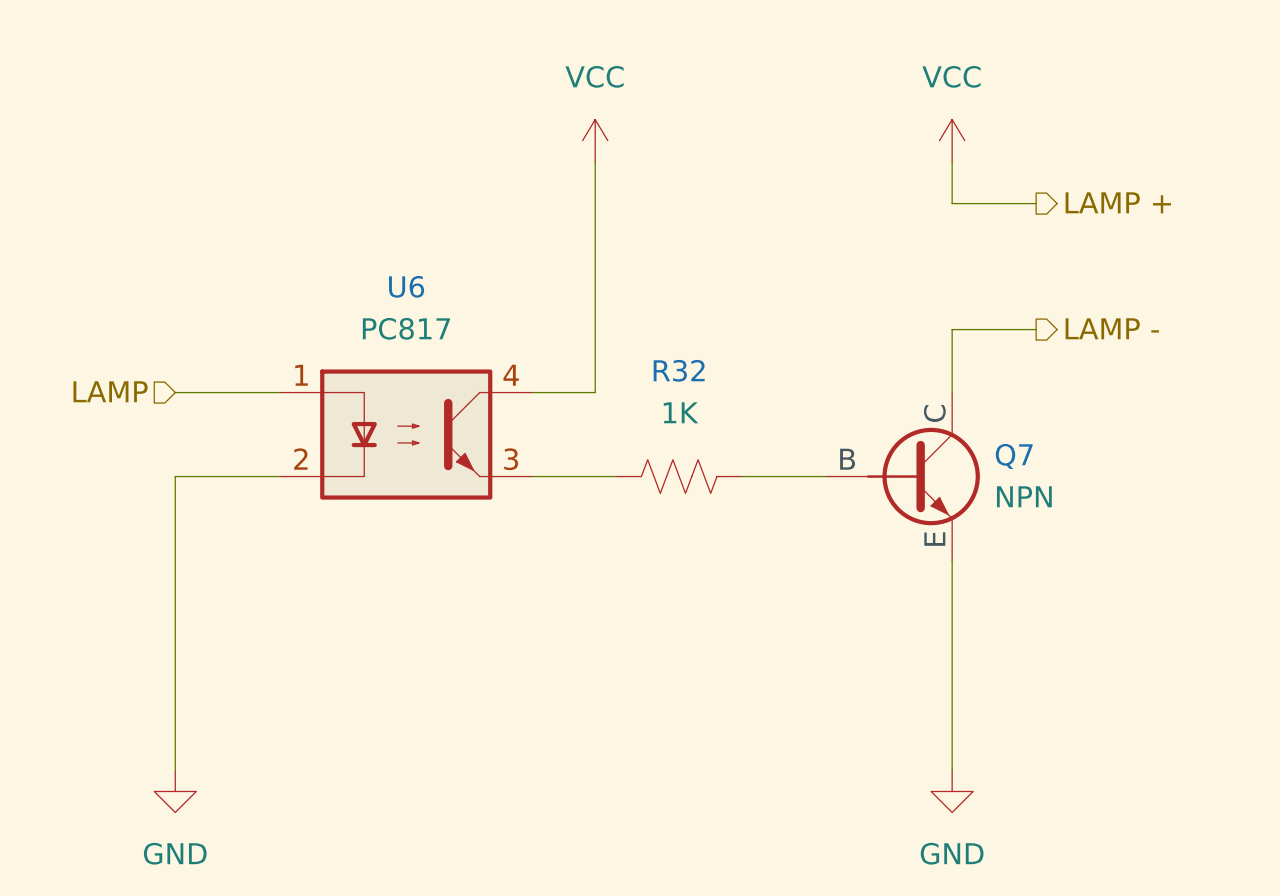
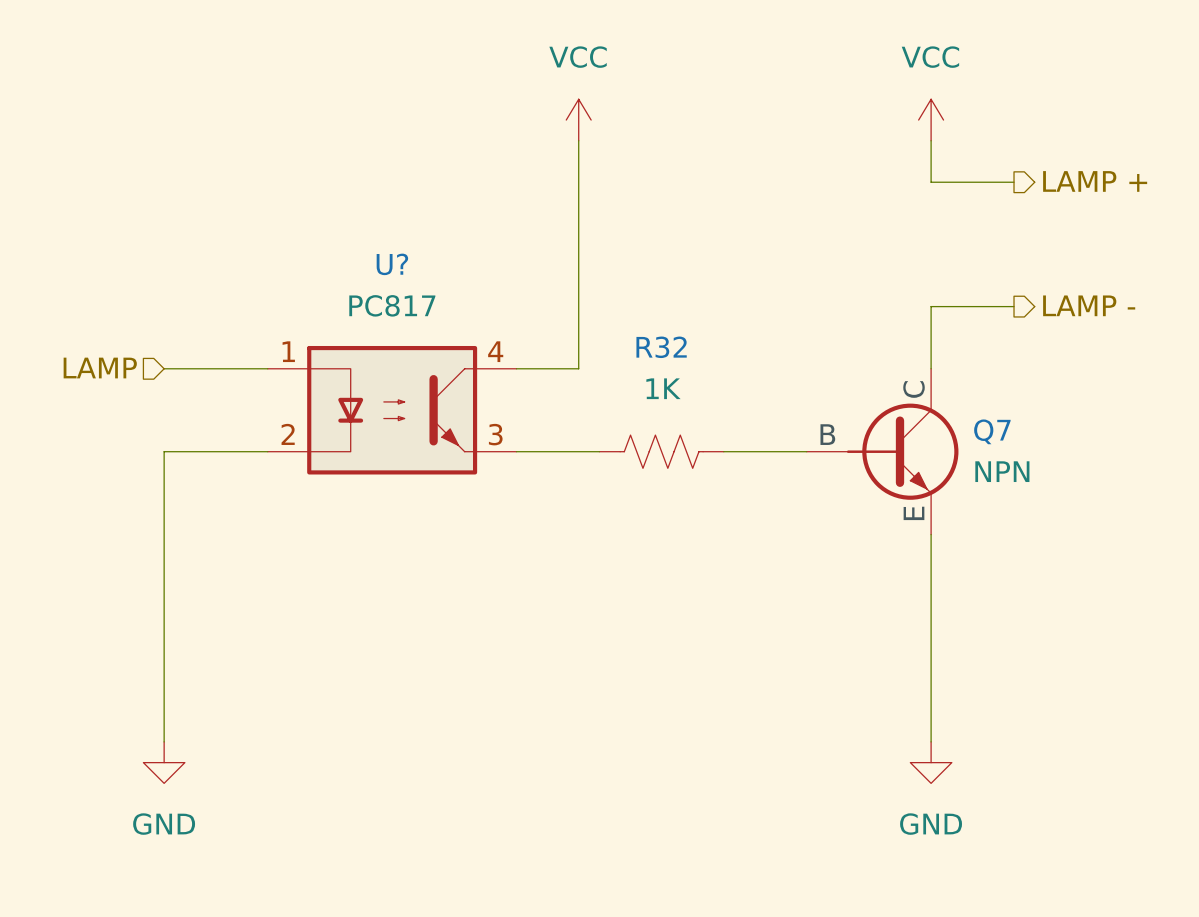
U6 name: U6 (406, 286) -> U? (392, 264)

